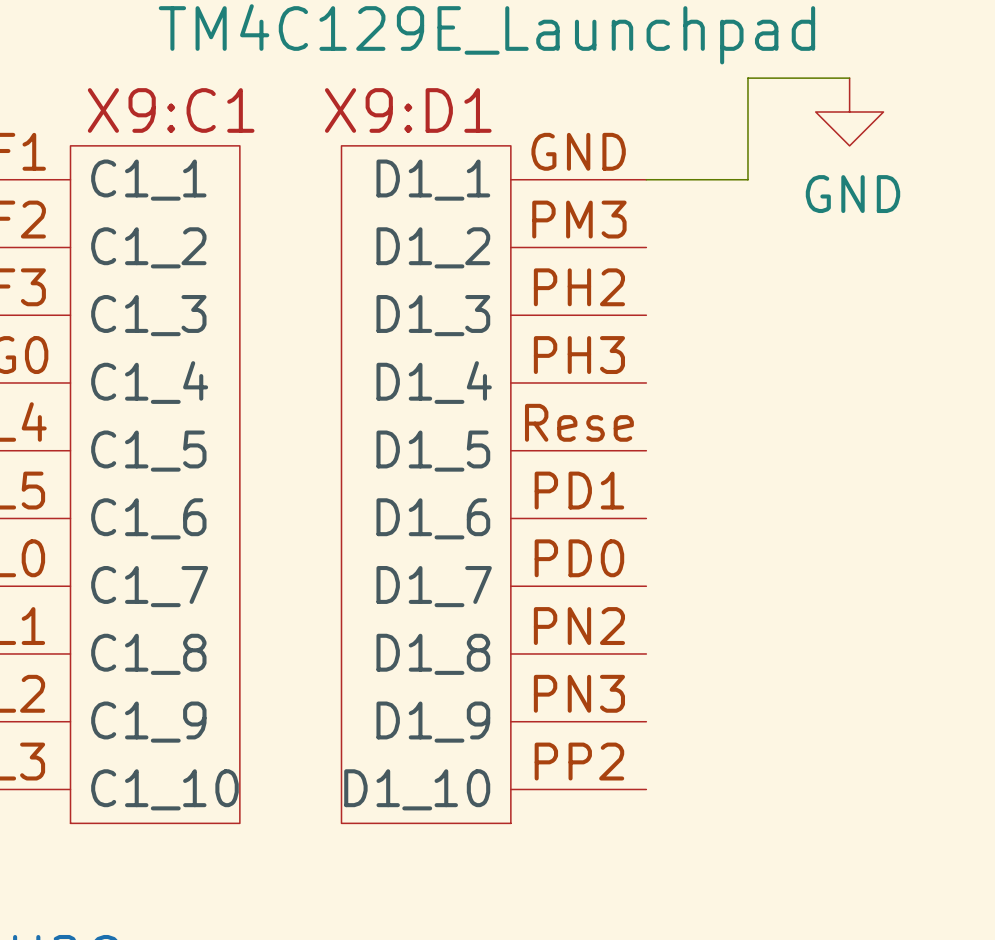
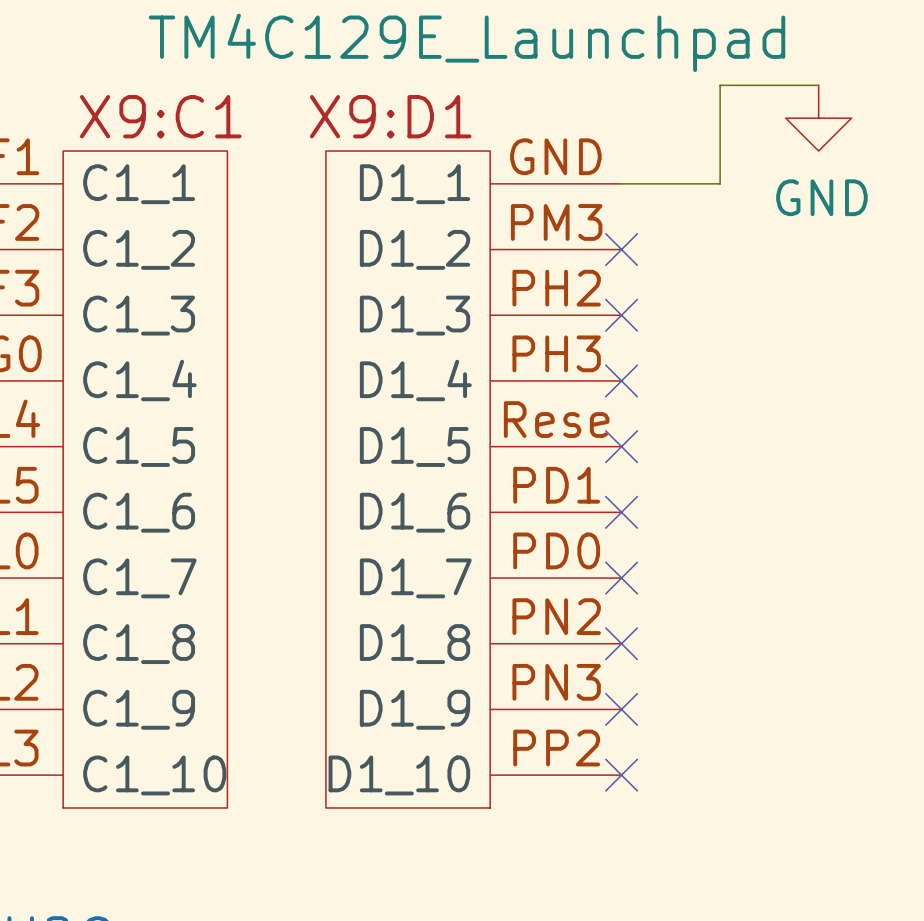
no-connect mark: none -> (621, 249)
no-connect mark: none -> (621, 315)
no-connect mark: none -> (621, 380)
no-connect mark: none -> (621, 446)
no-connect mark: none -> (621, 512)
no-connect mark: none -> (621, 578)
no-connect mark: none -> (621, 643)
no-connect mark: none -> (621, 709)
no-connect mark: none -> (621, 775)

